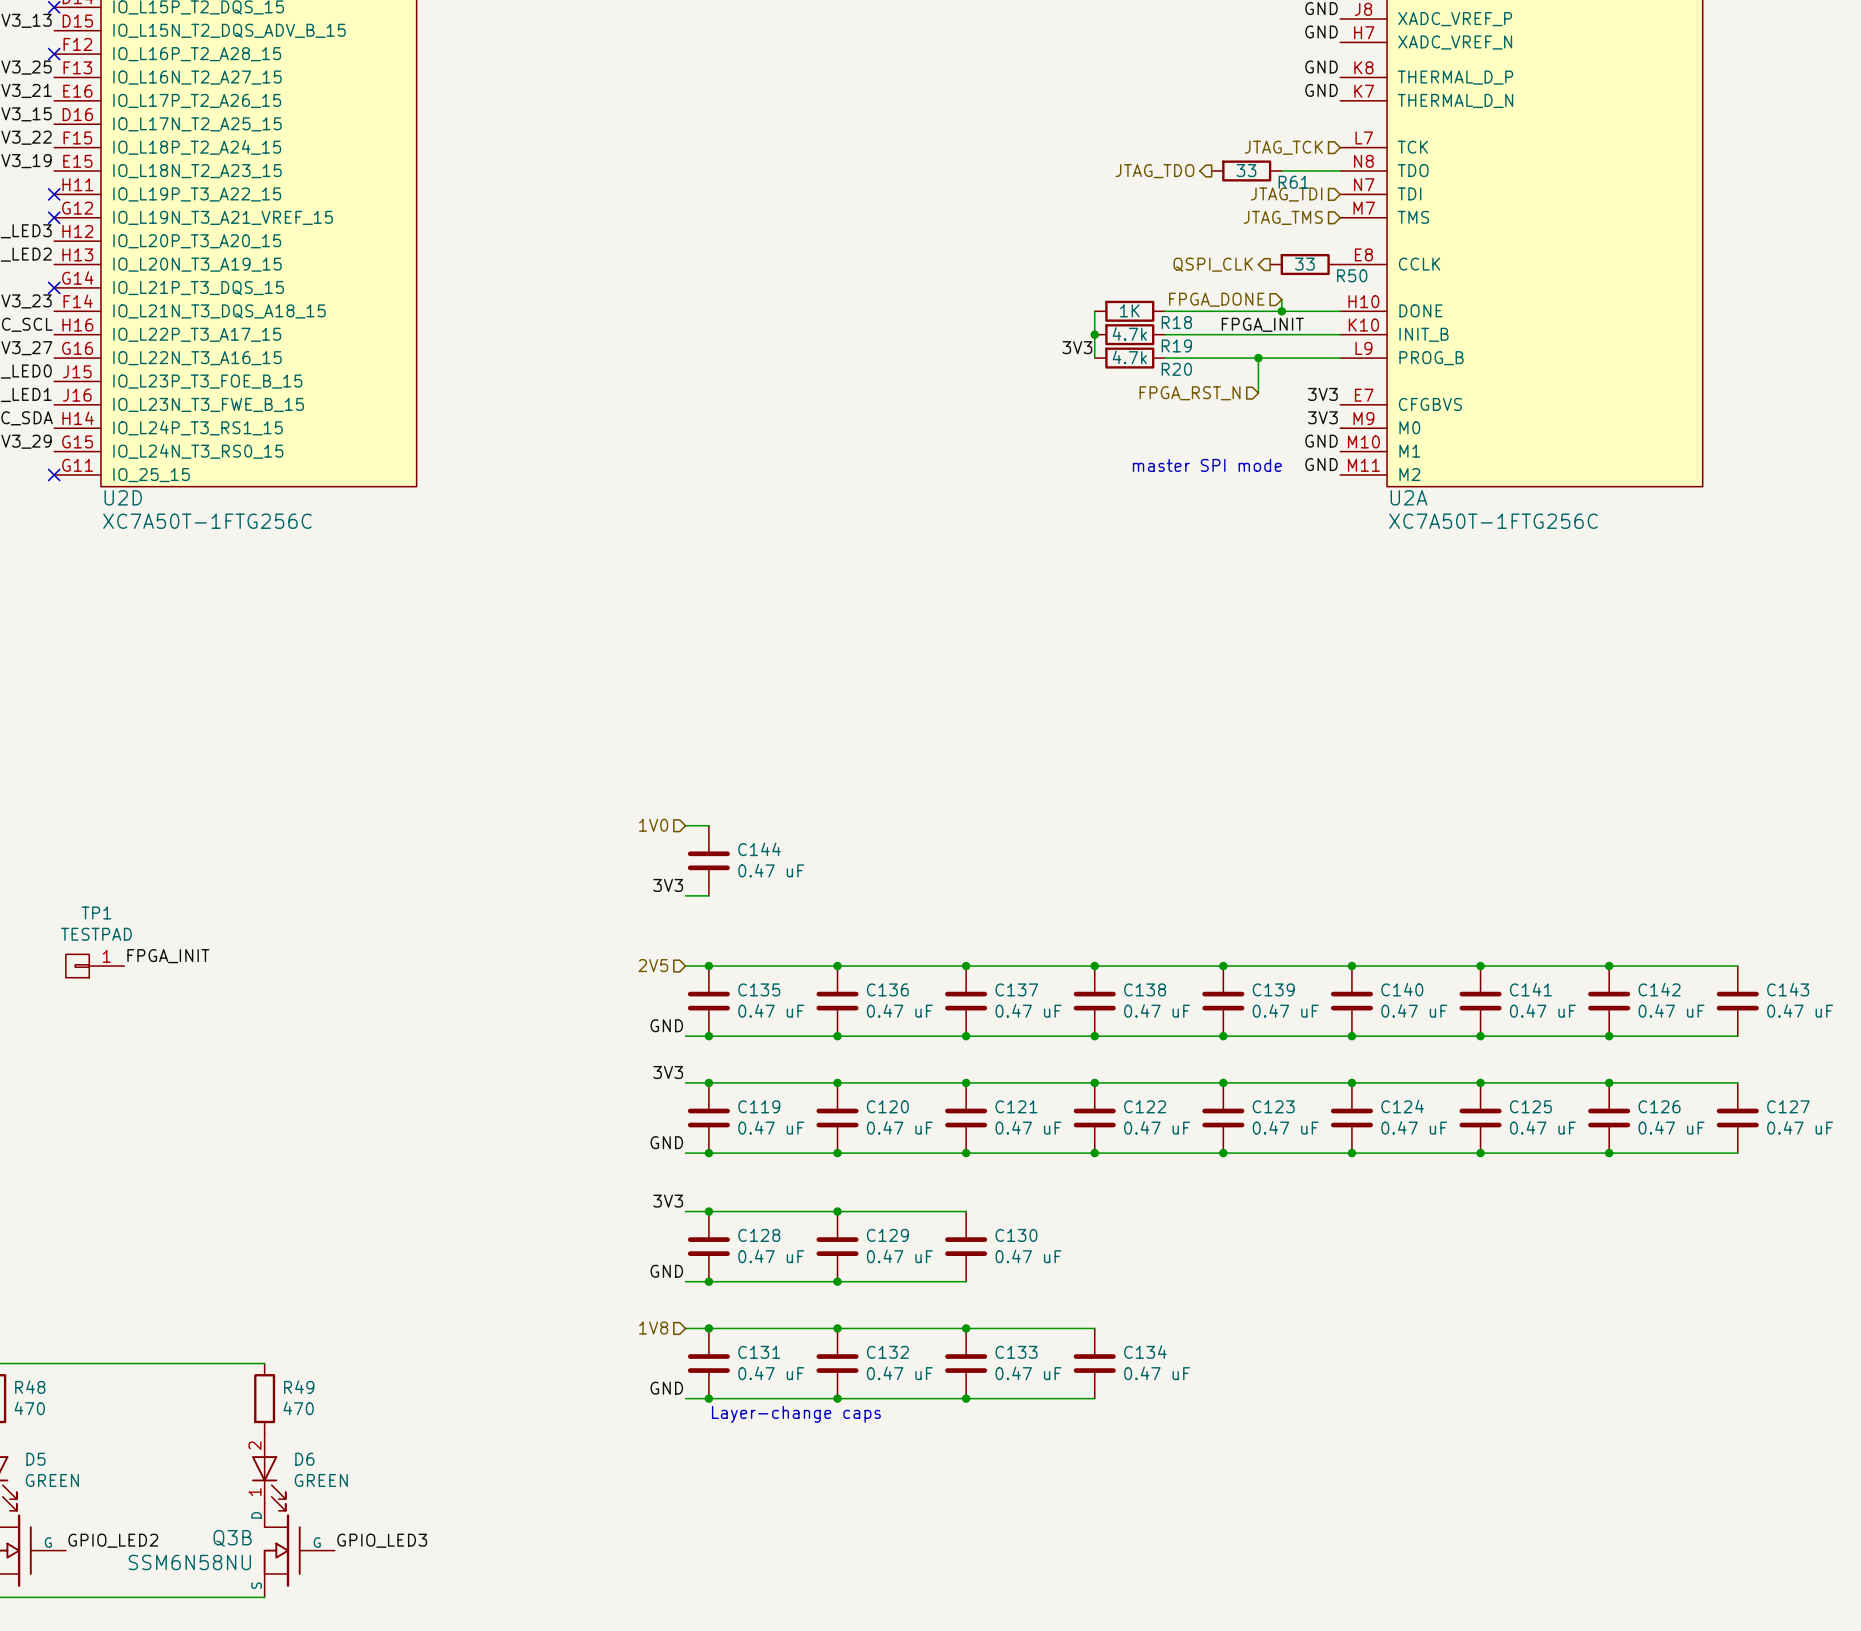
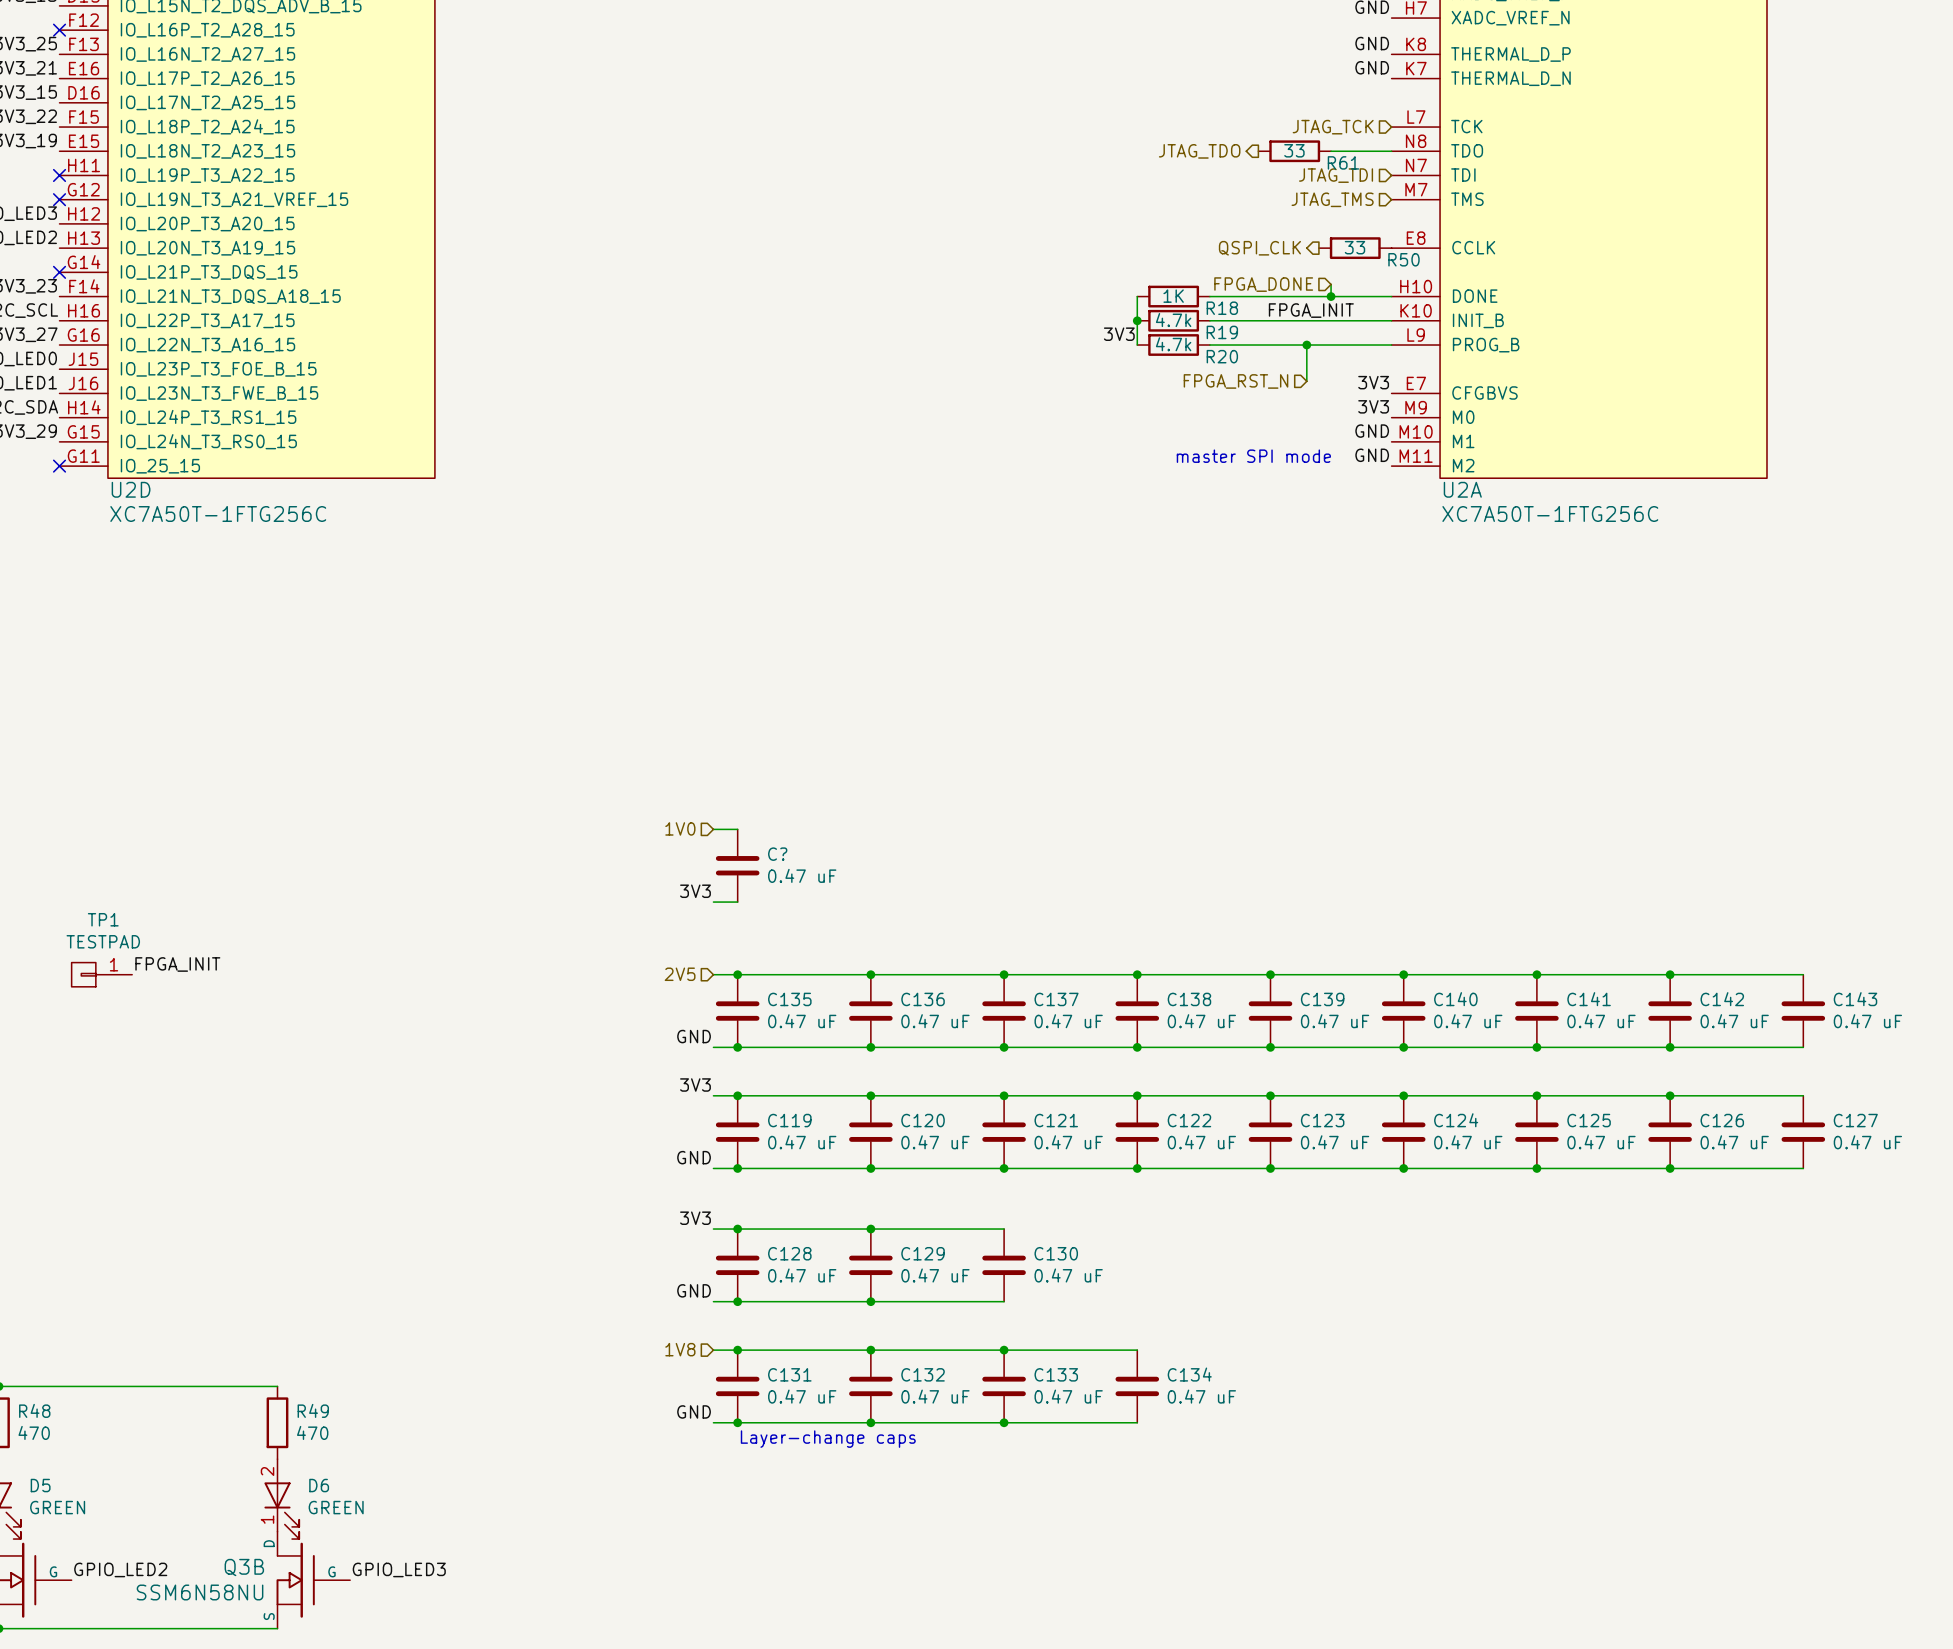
C144 name: C144 (759, 849) -> C? (777, 854)

